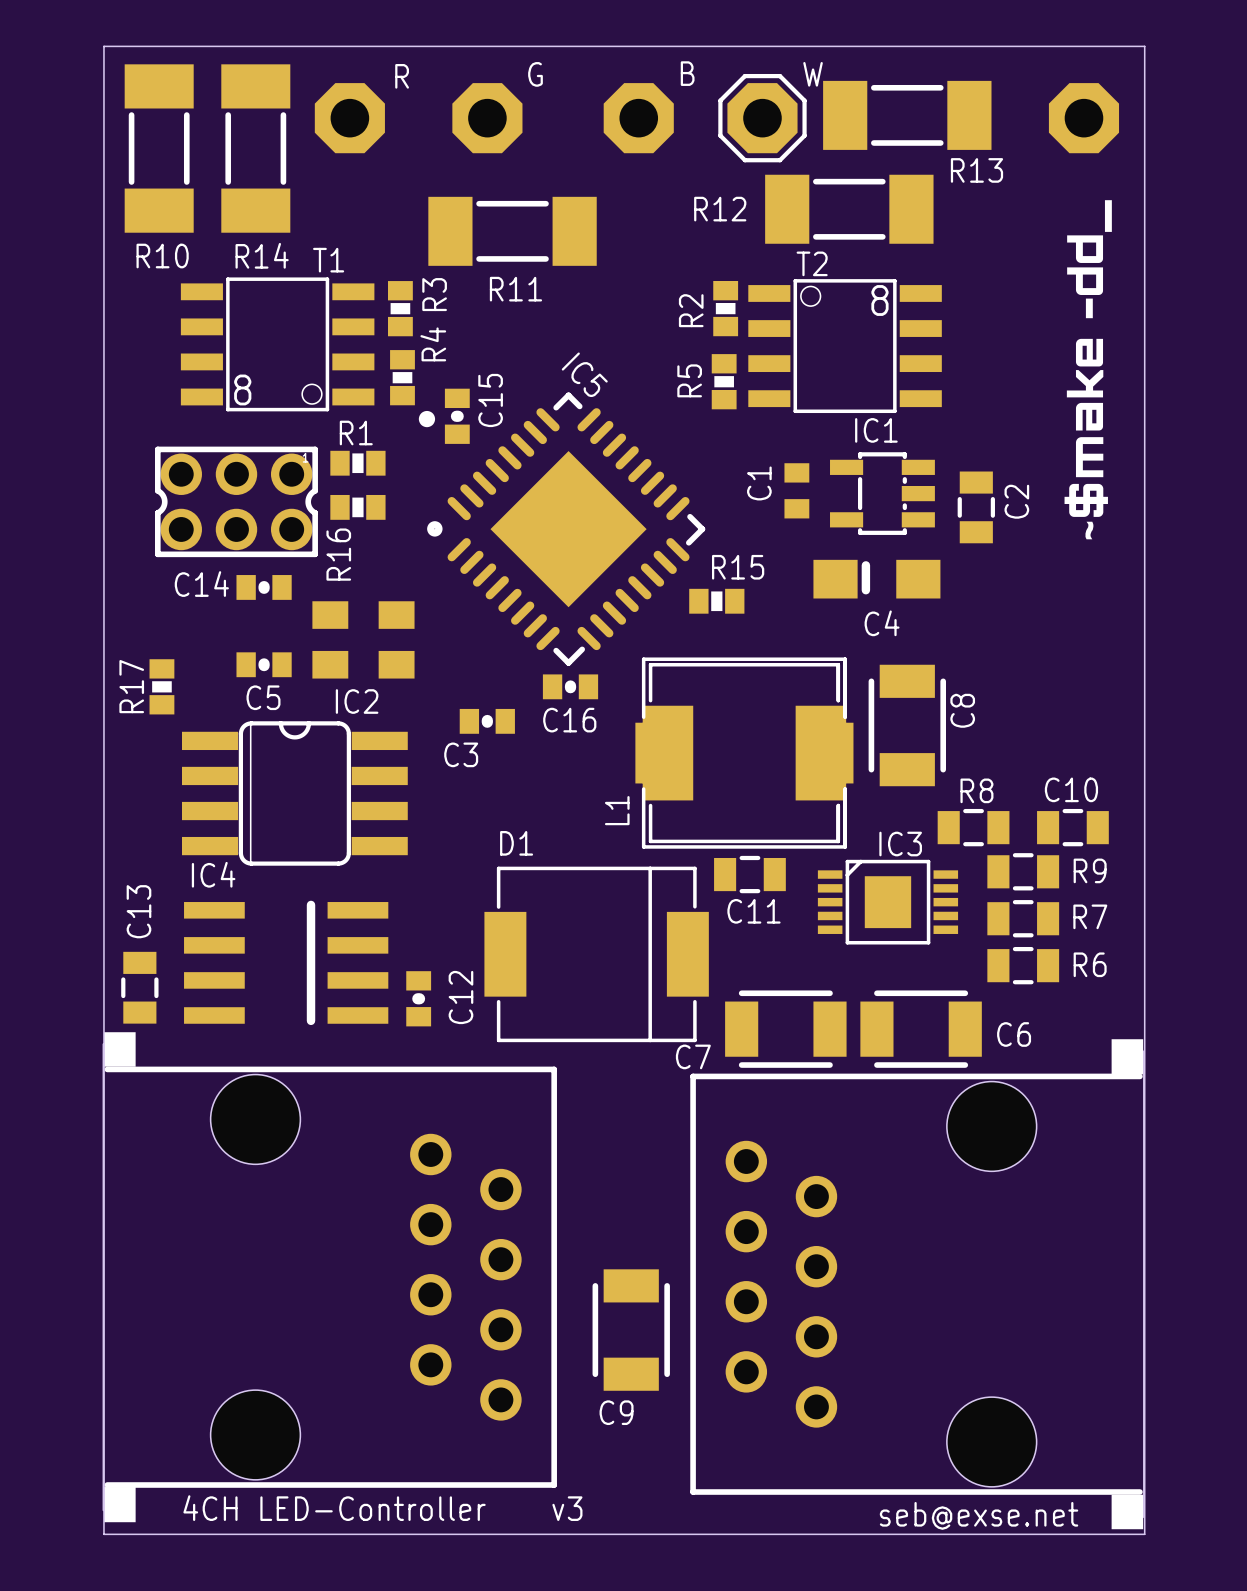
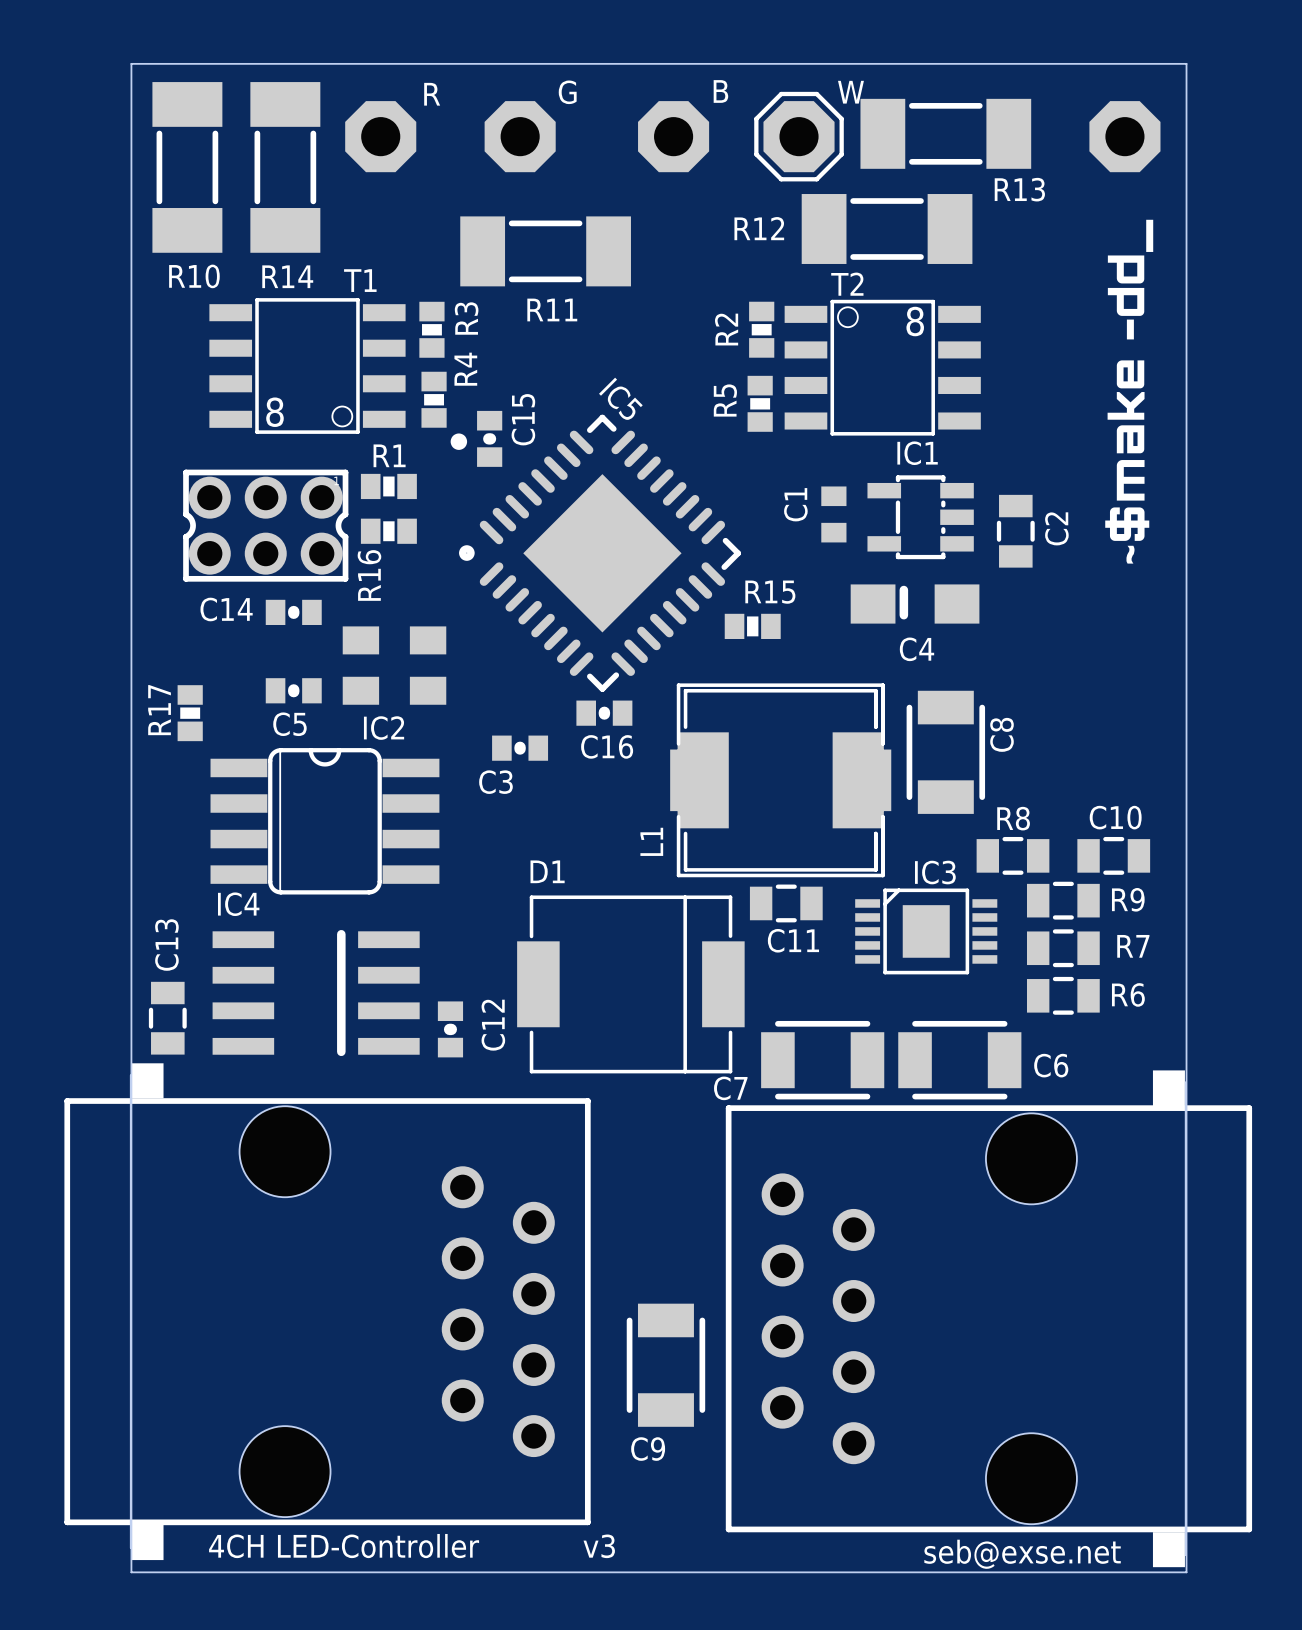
part: none -> (327, 1311)
part: (330, 1277) -> none
part: (917, 1284) -> none
part: none -> (988, 1318)

